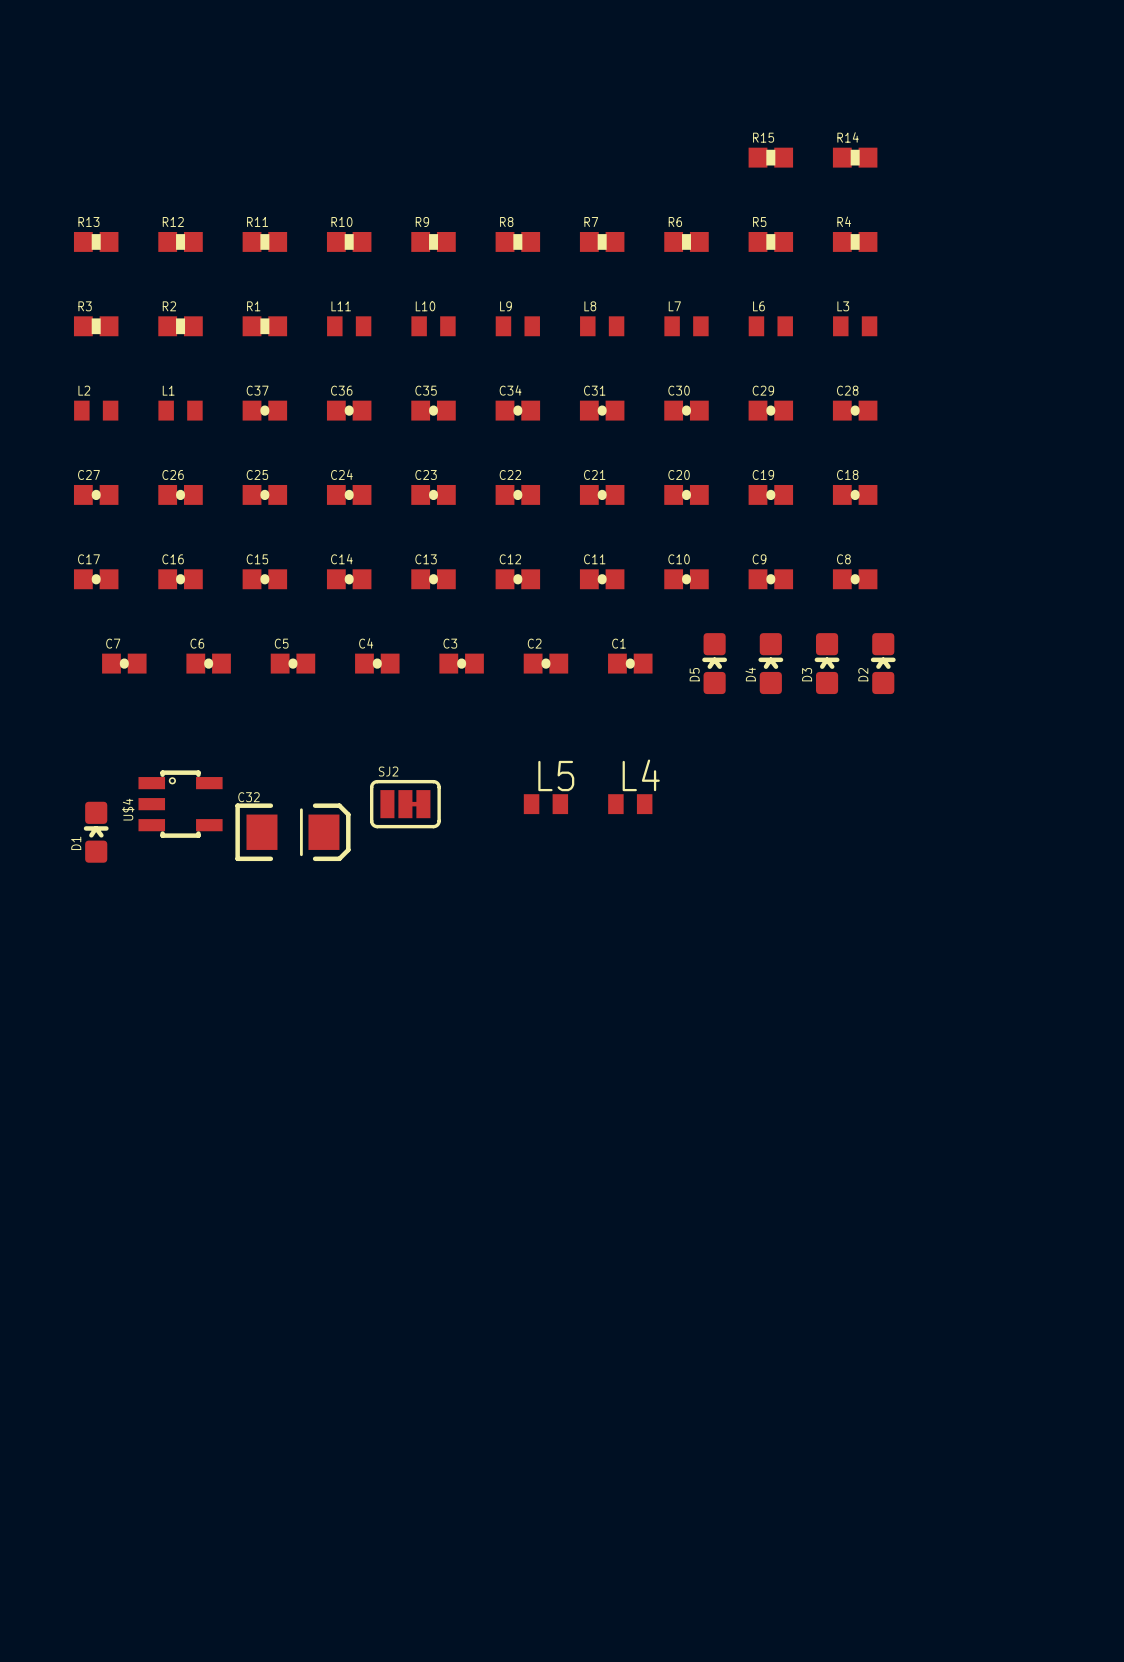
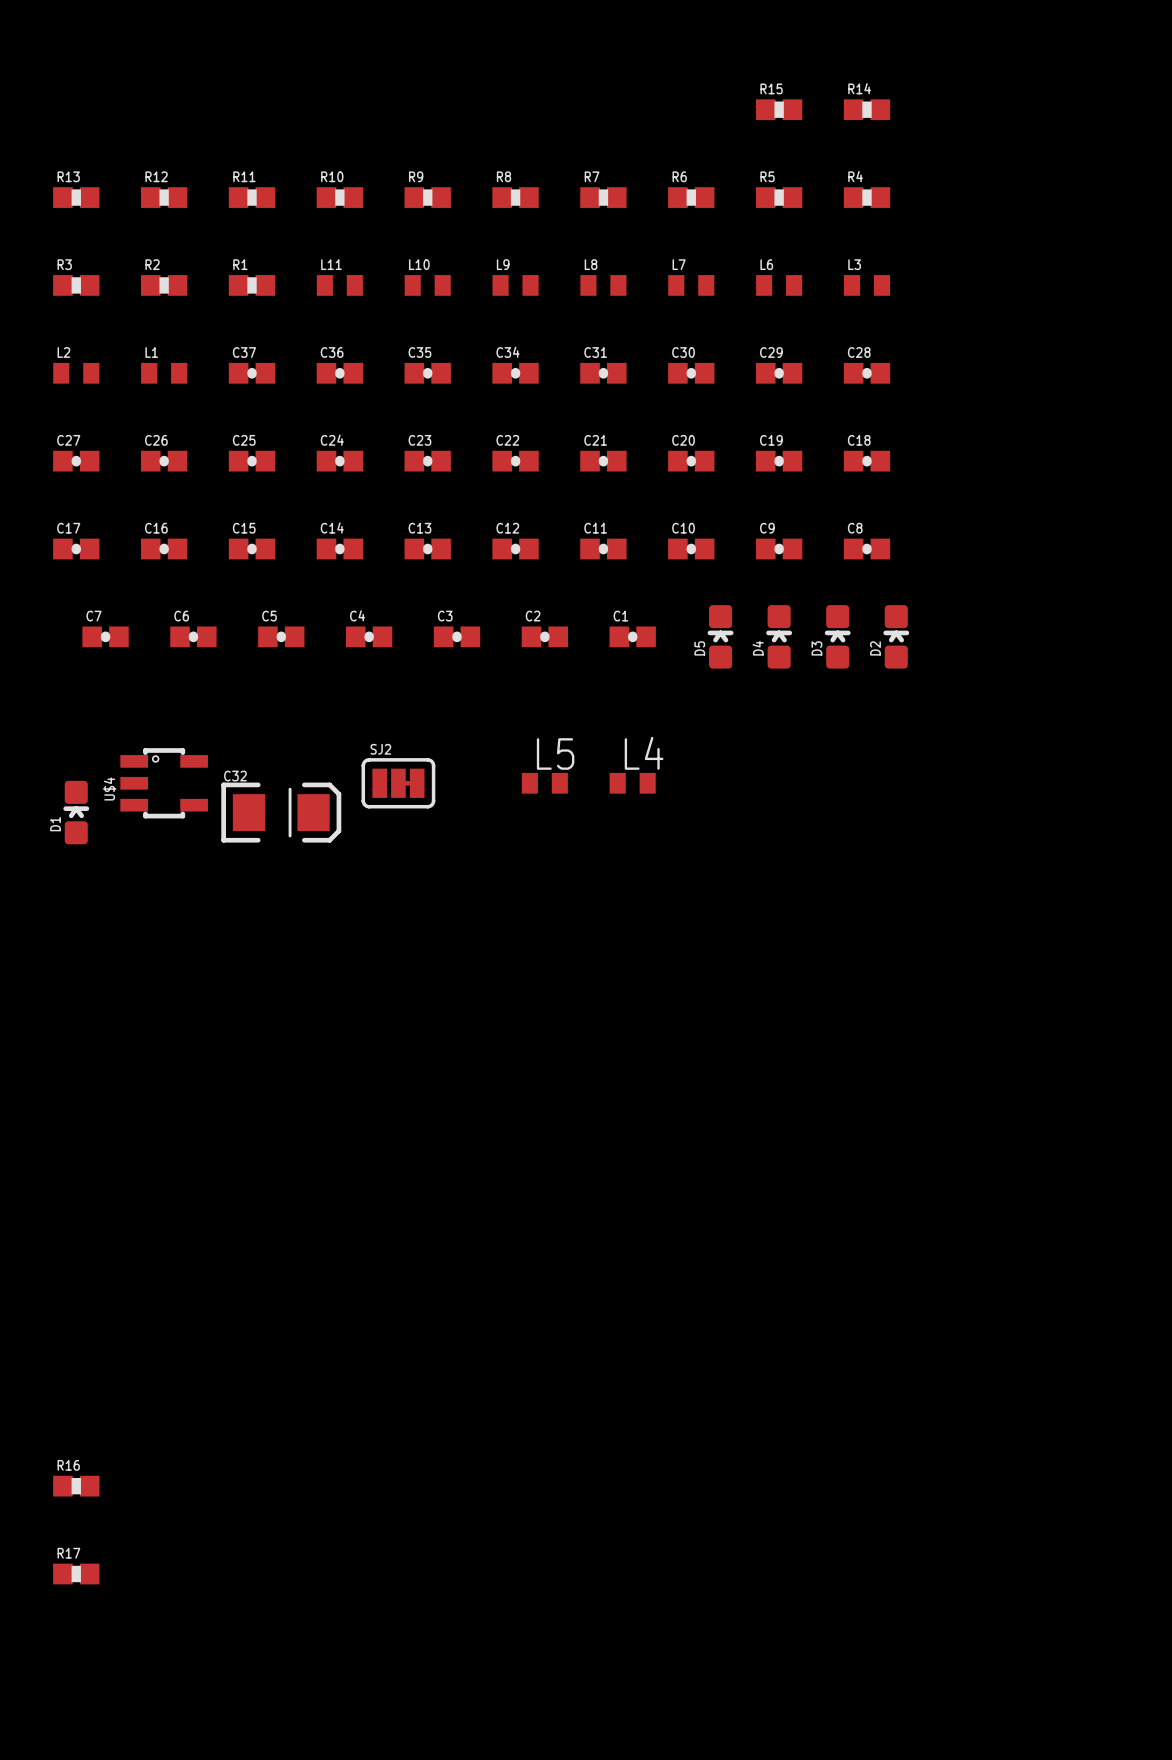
R16: none -> (76, 1486)
R17: none -> (76, 1574)

